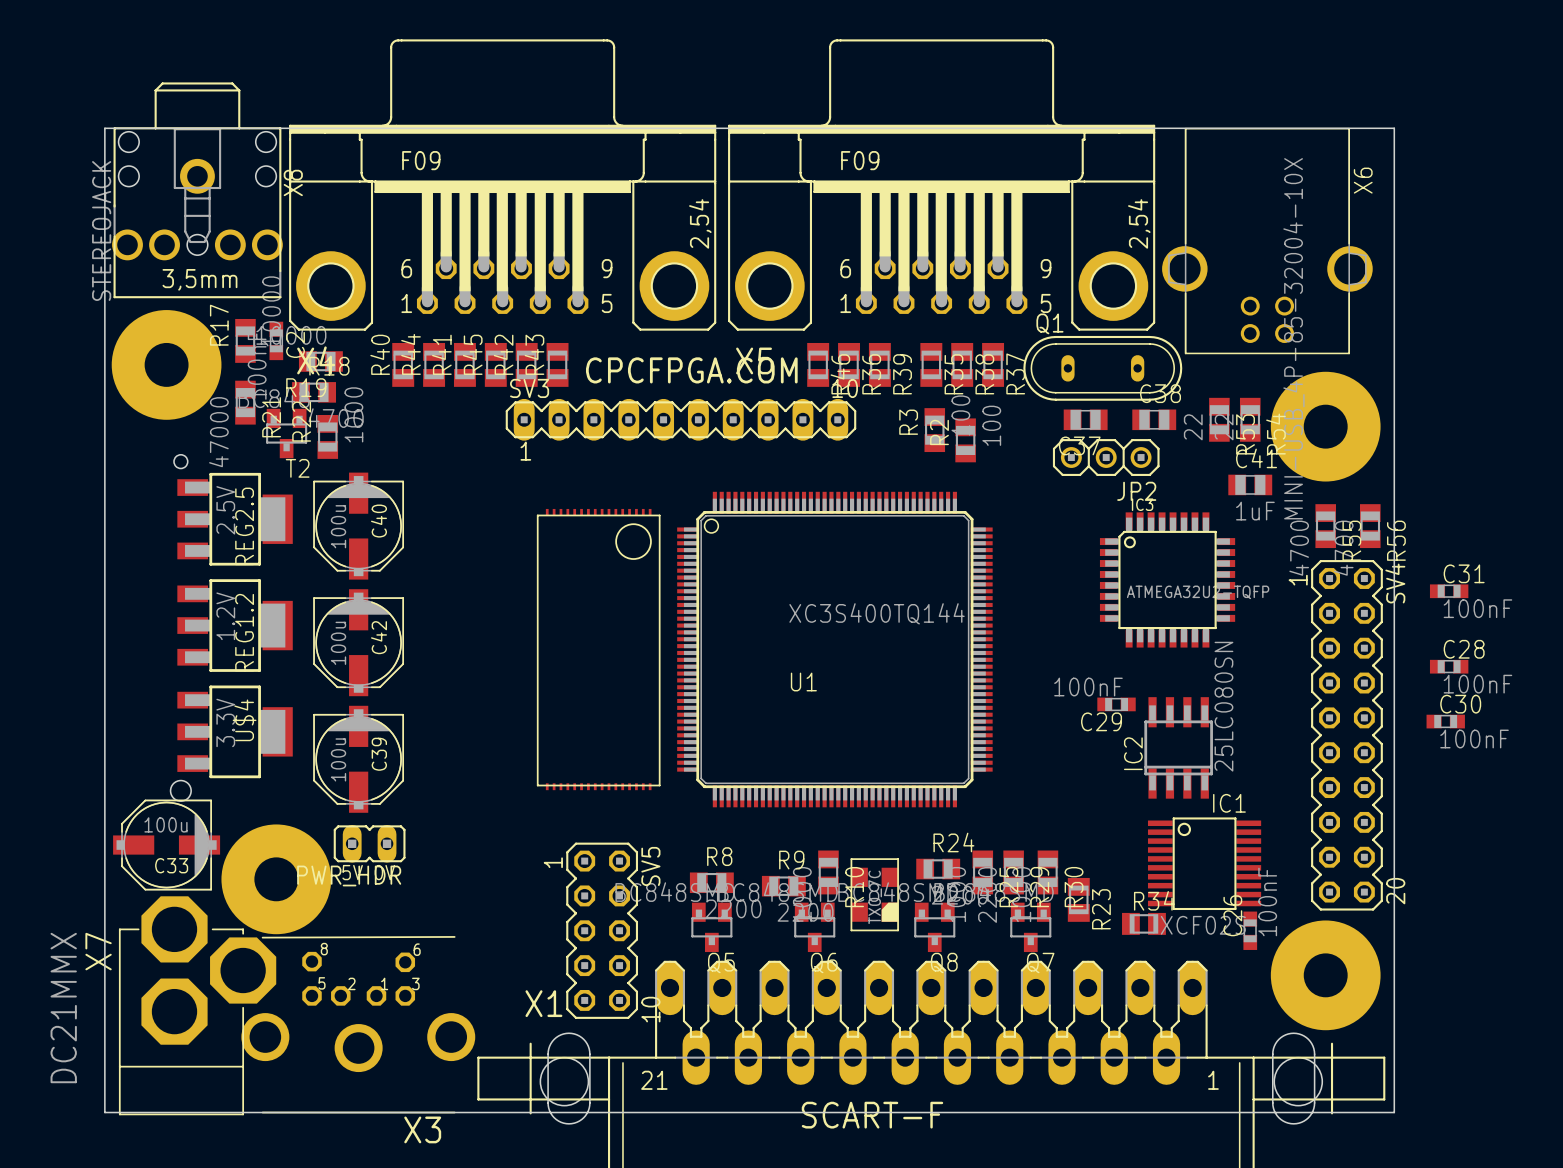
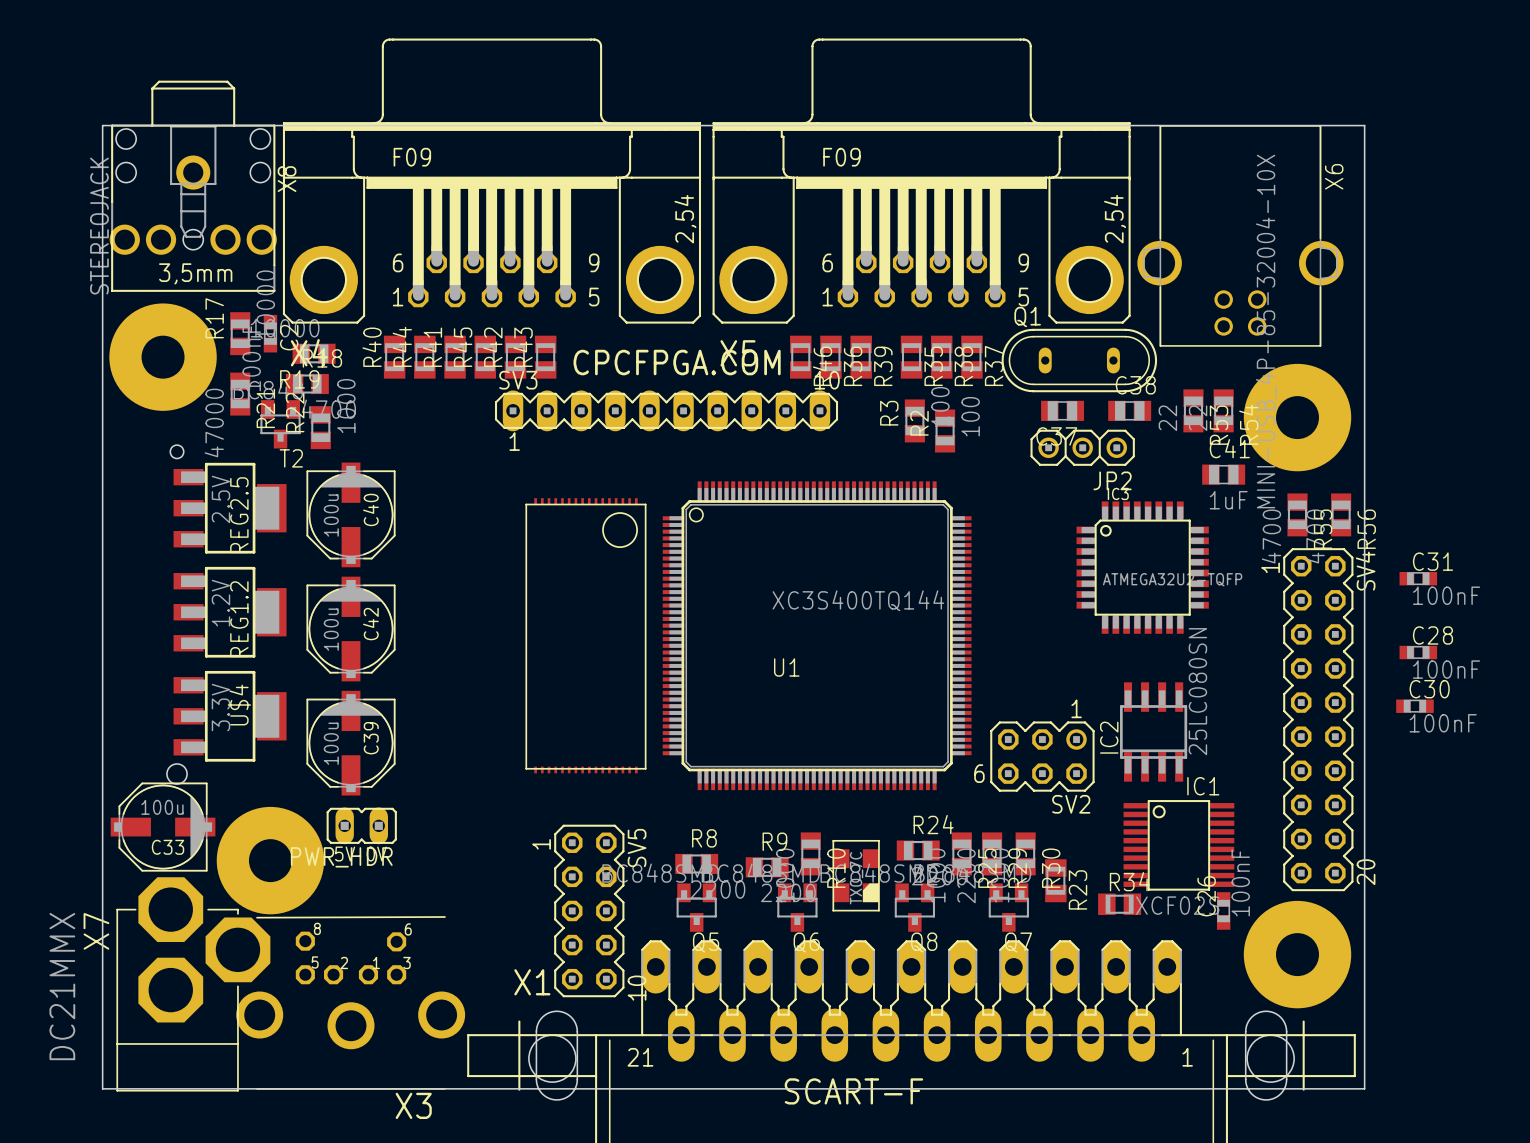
C29: 100nF (1116, 704) -> none
SV2: none -> (1042, 756)

